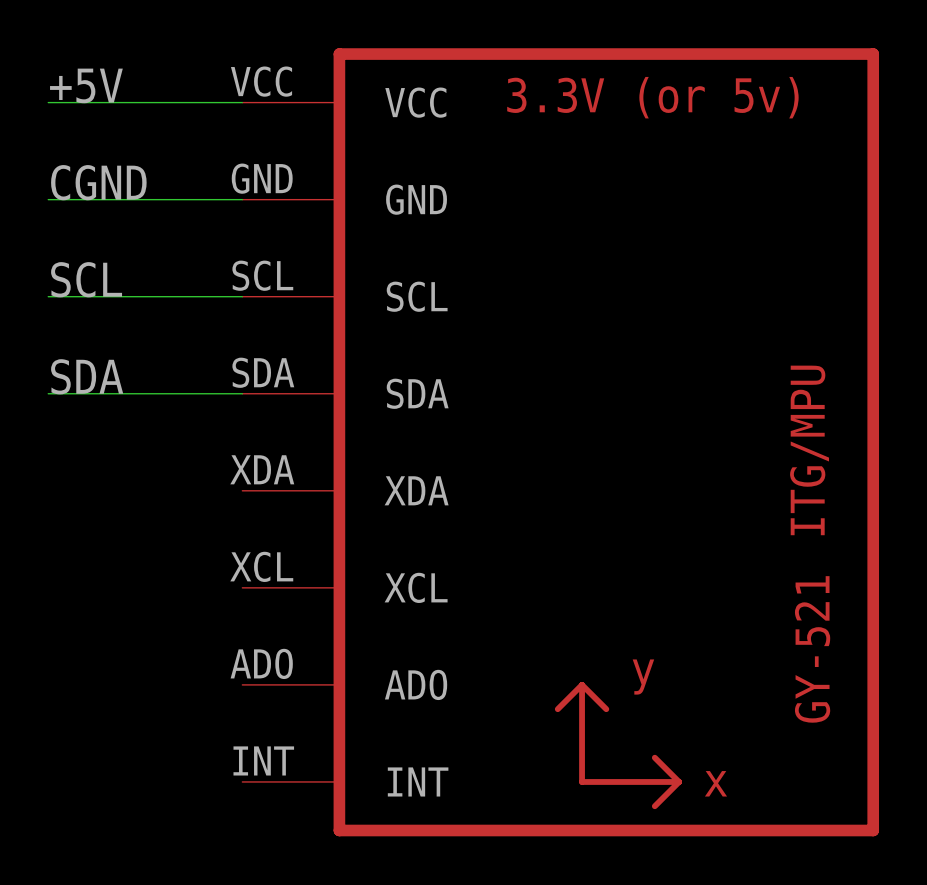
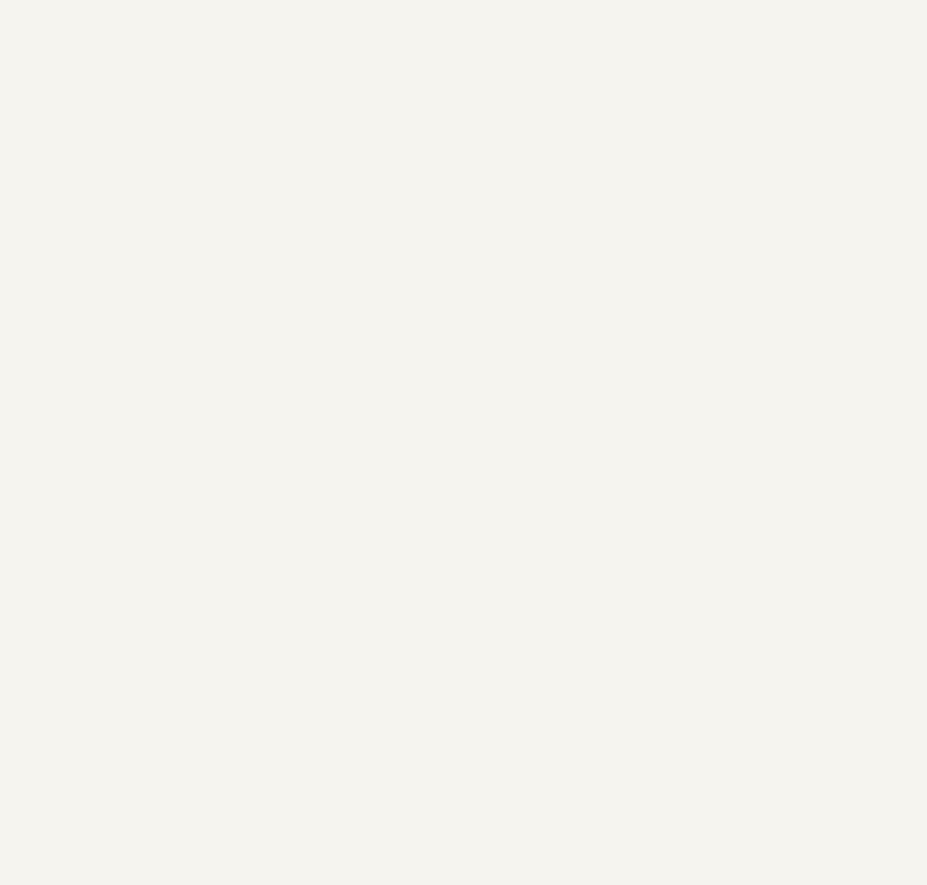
label: +5V (86, 85) -> none
wire: (48, 102) (242, 102) -> none
label: CGND (98, 182) -> none
wire: (48, 199) (242, 199) -> none
label: SCL (86, 279) -> none
wire: (48, 296) (242, 296) -> none
label: SDA (87, 376) -> none
wire: (48, 393) (242, 393) -> none
part: (560, 442) -> none

